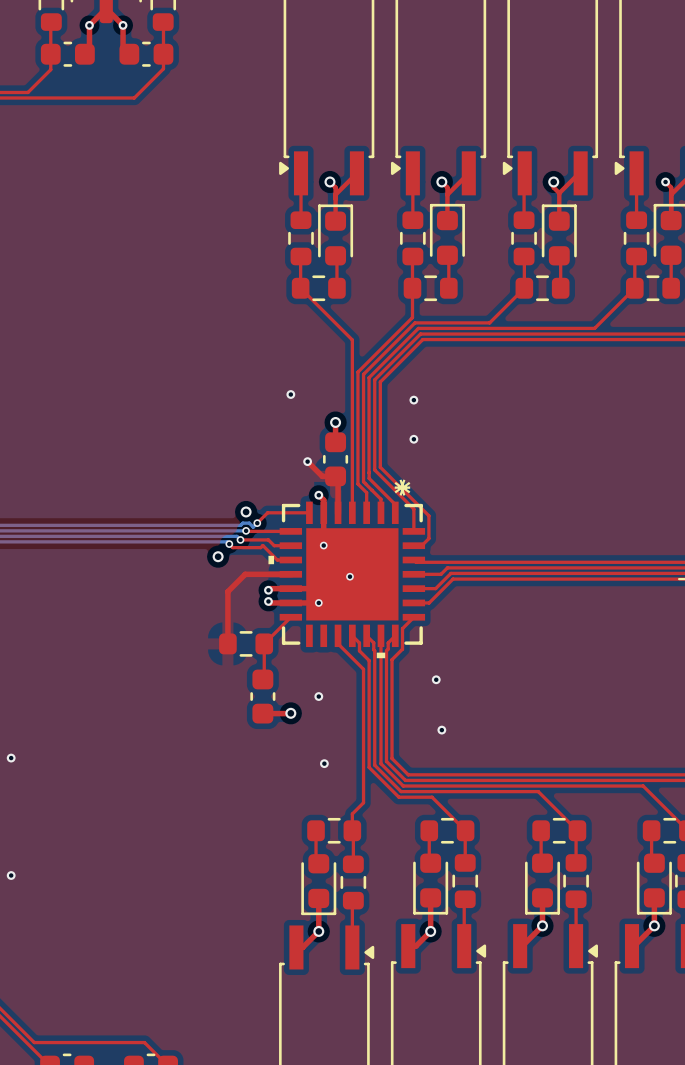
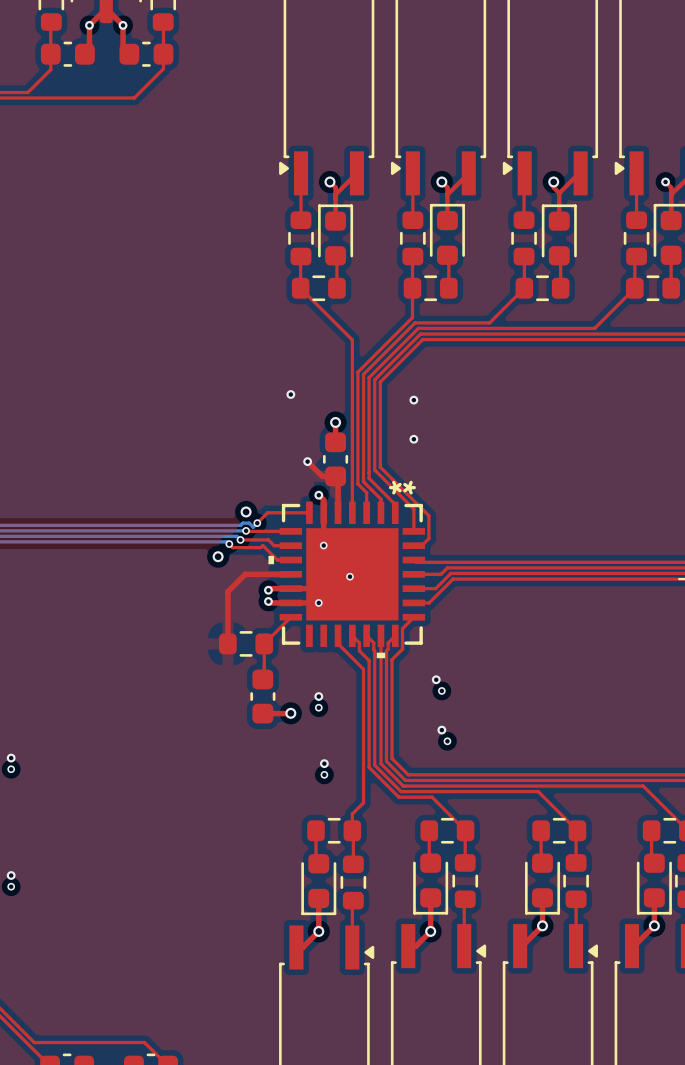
via: none -> (441, 690)
via: none -> (318, 707)
via: none -> (447, 741)
via: none -> (11, 769)
via: none -> (324, 774)
via: none -> (11, 886)

